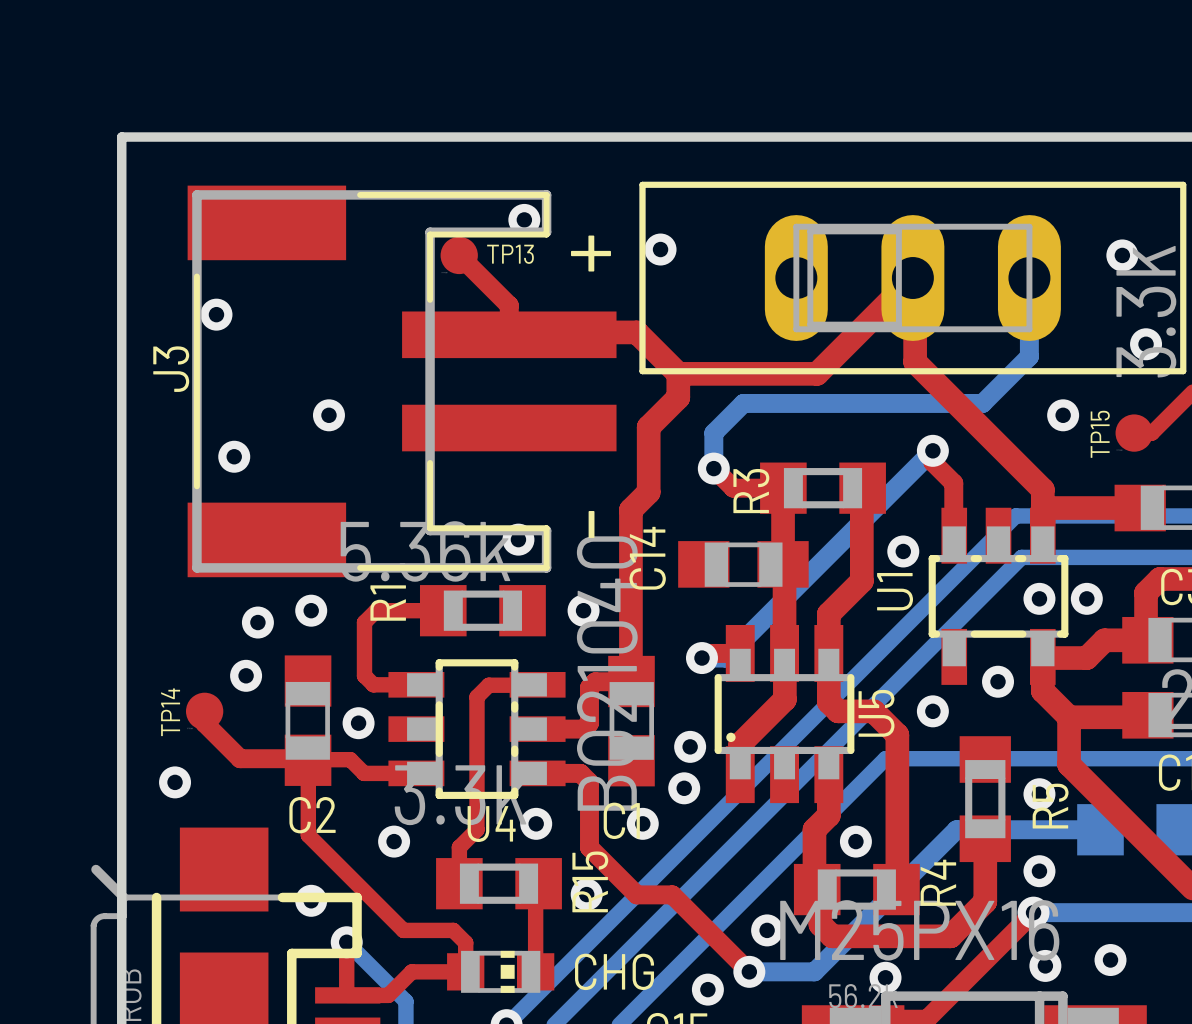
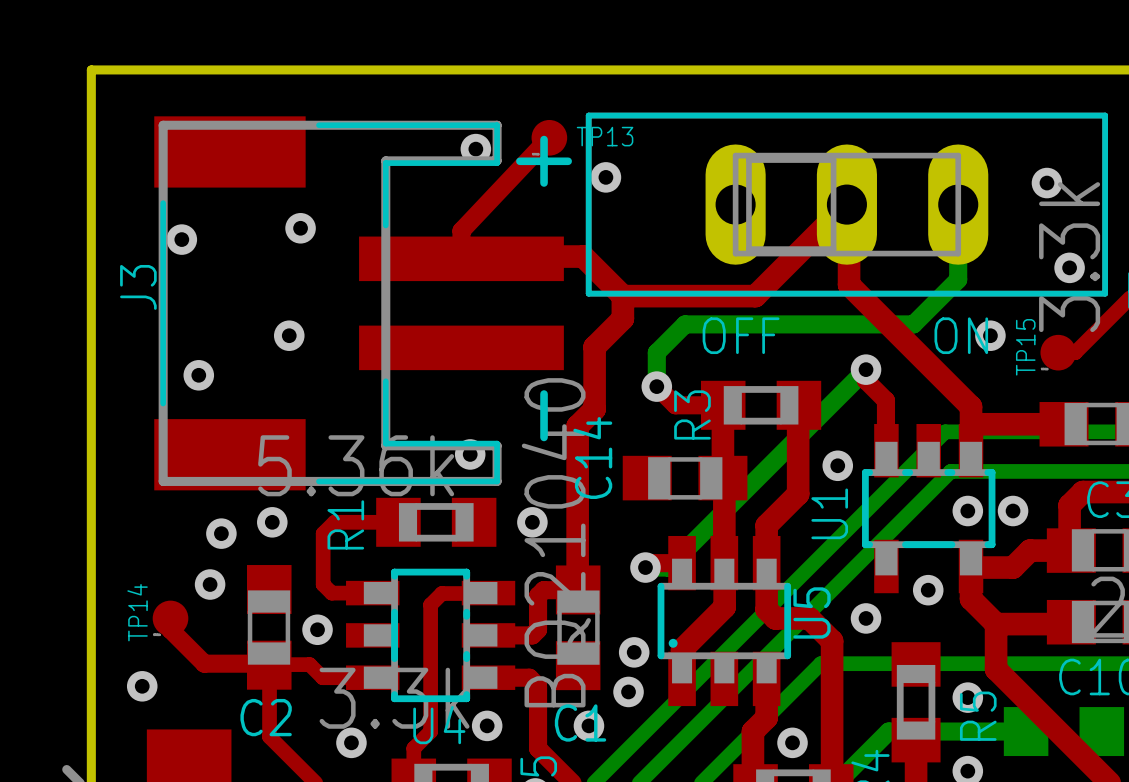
top track: (459, 255) (509, 305) -> (549, 137) (461, 230)
TP13 position: (459, 255) -> (549, 137)
via: none -> (300, 228)
text: none -> OFF (741, 335)
text: none -> ON (961, 335)

